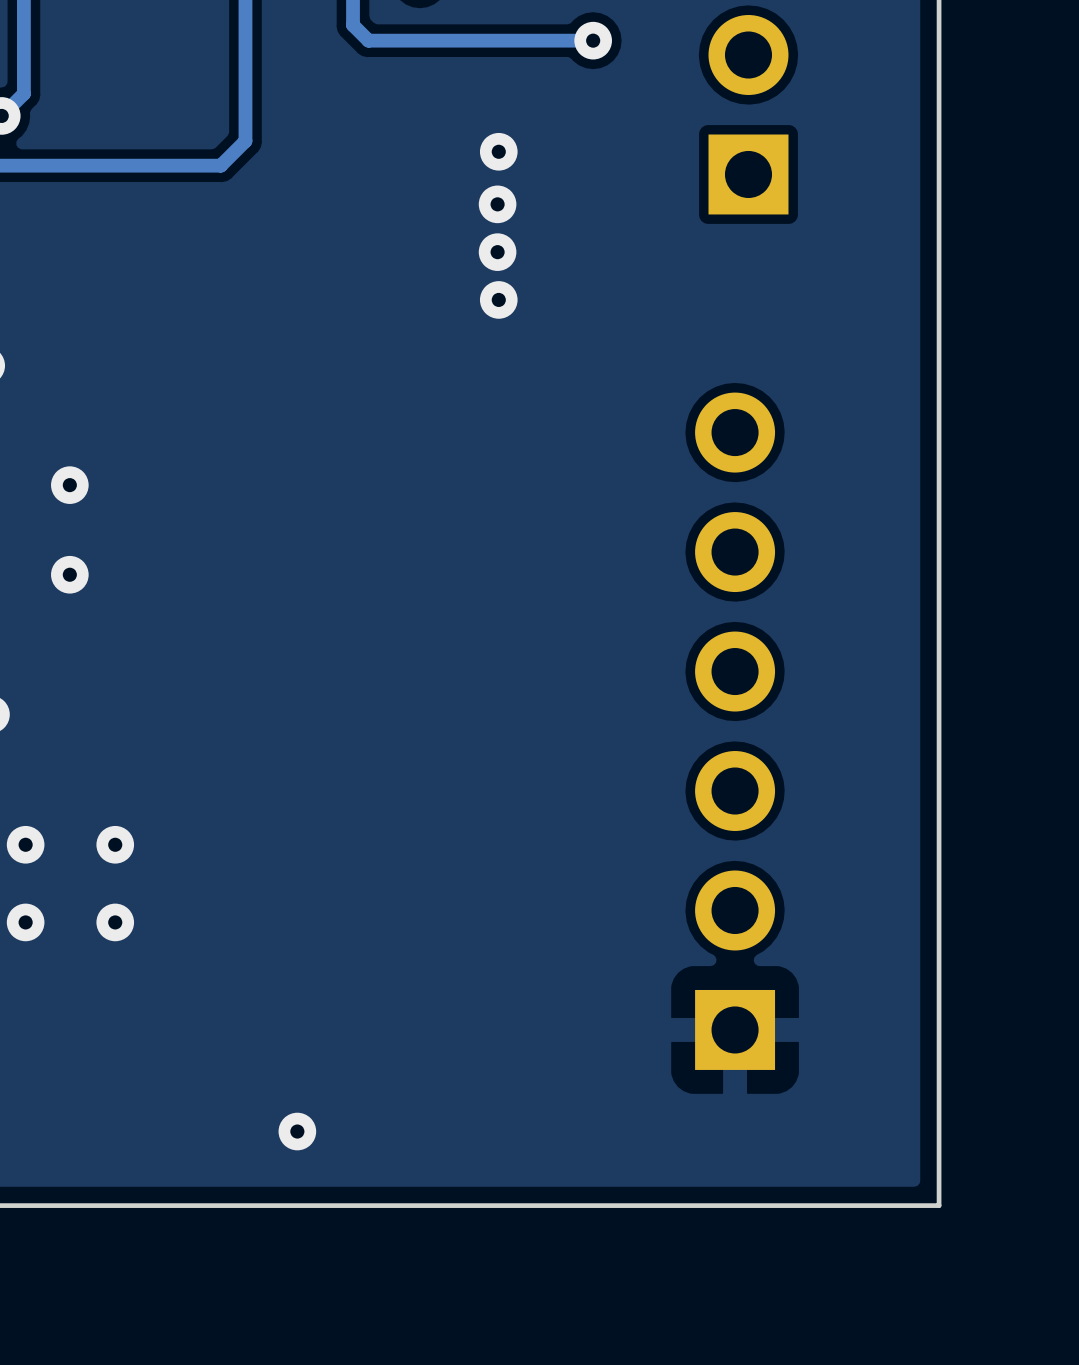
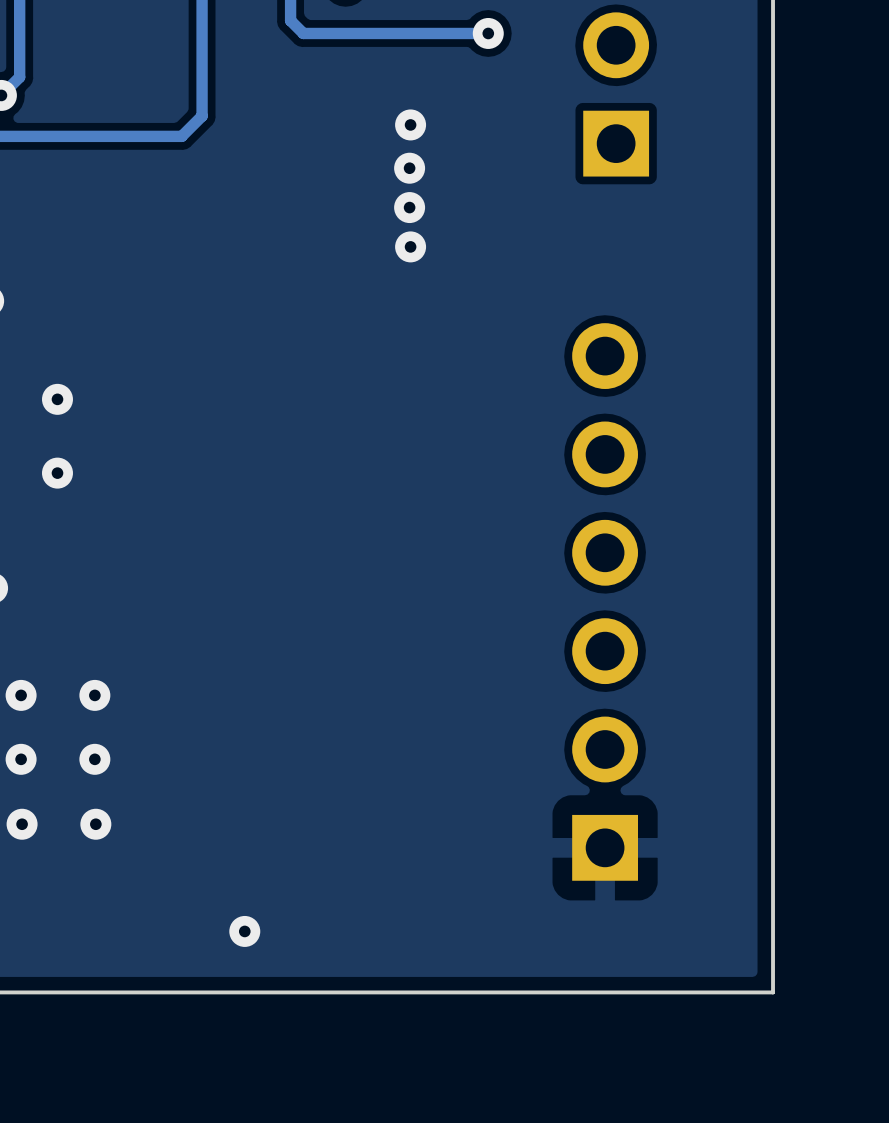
via: none -> (22, 824)
via: none -> (95, 824)

